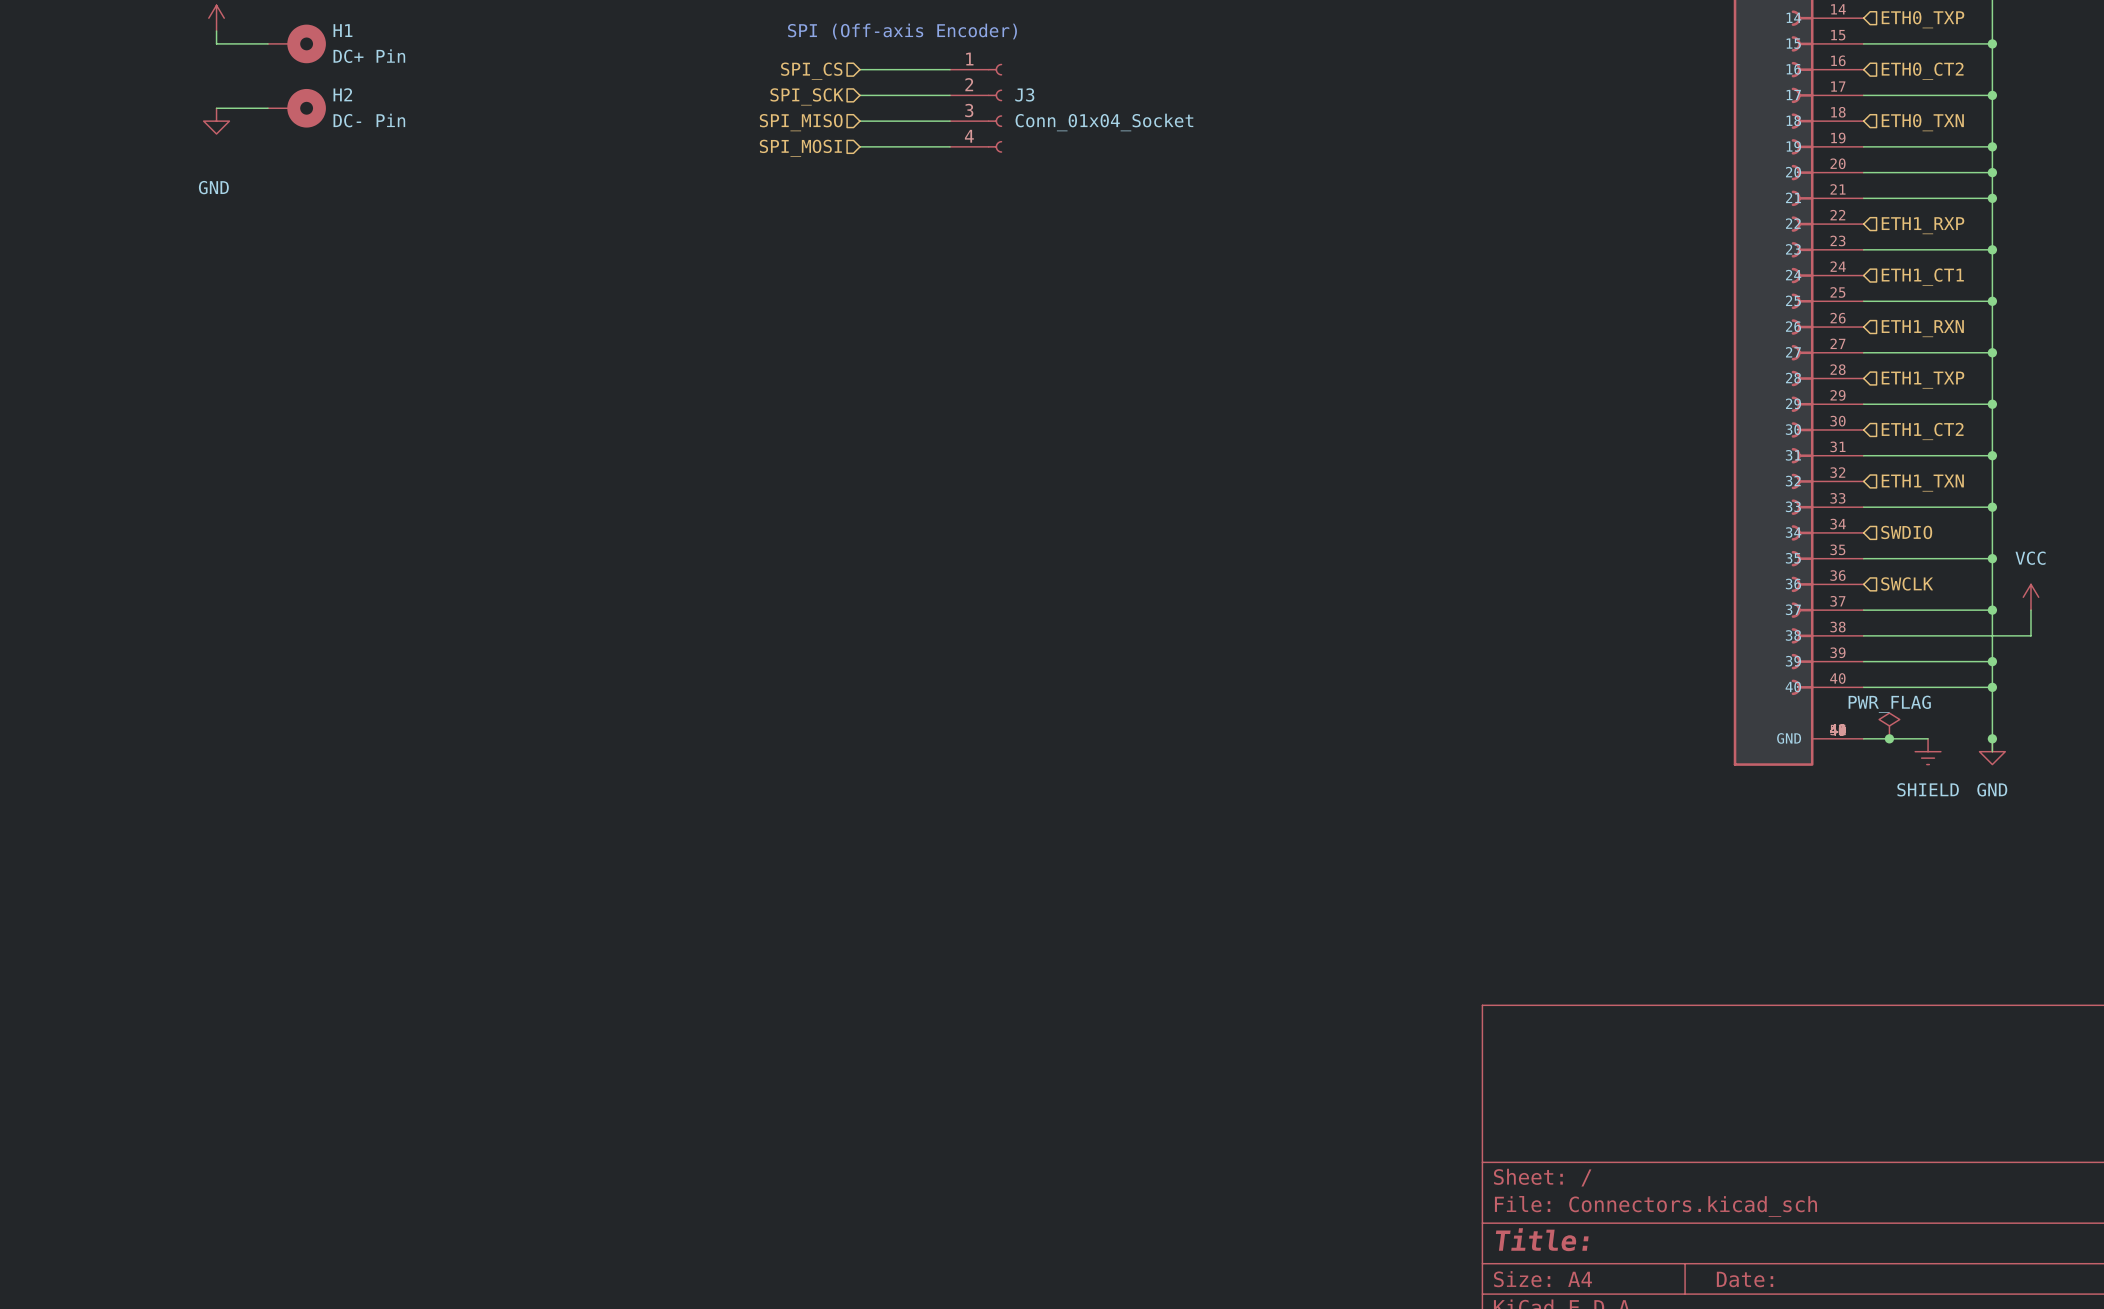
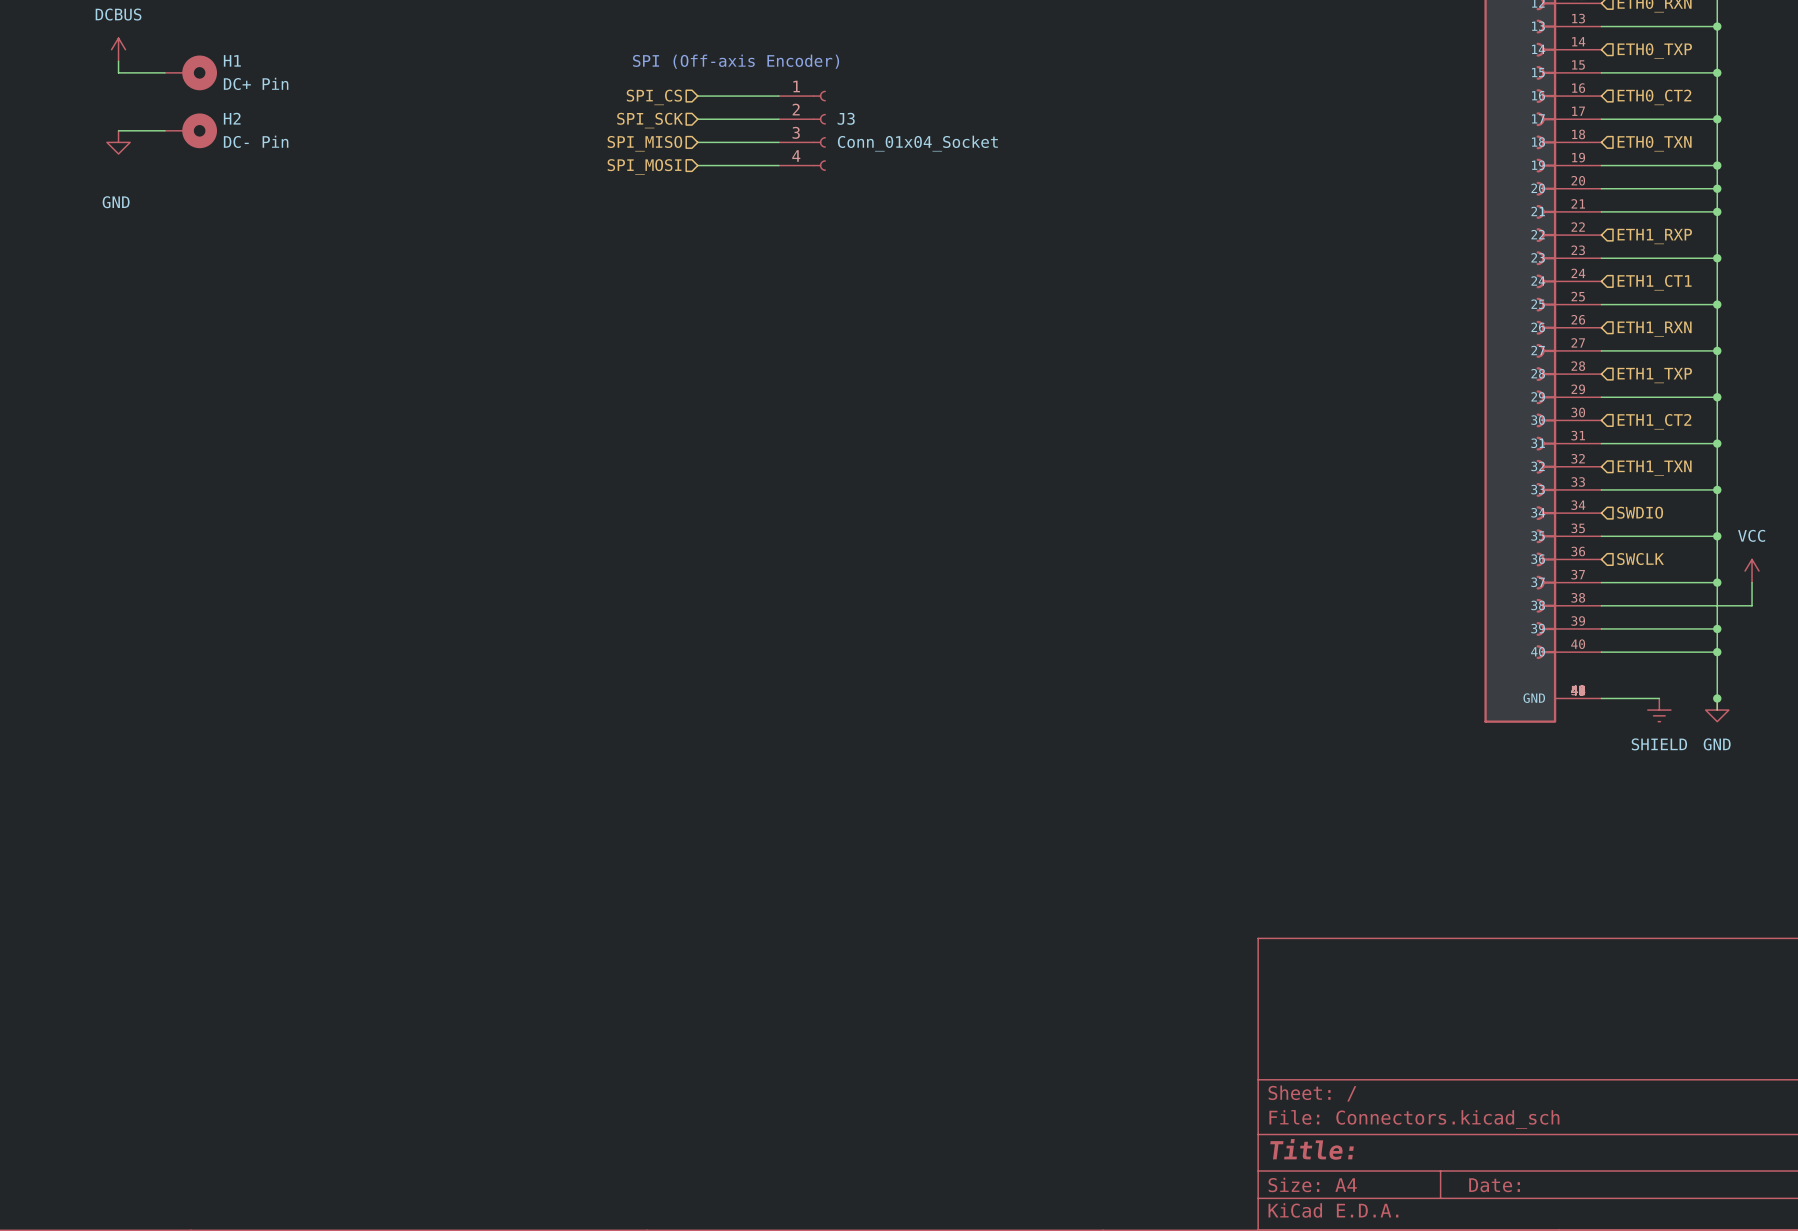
power symbol: PWR_FLAG (1889, 725) -> none
junction: (1889, 738) -> none

